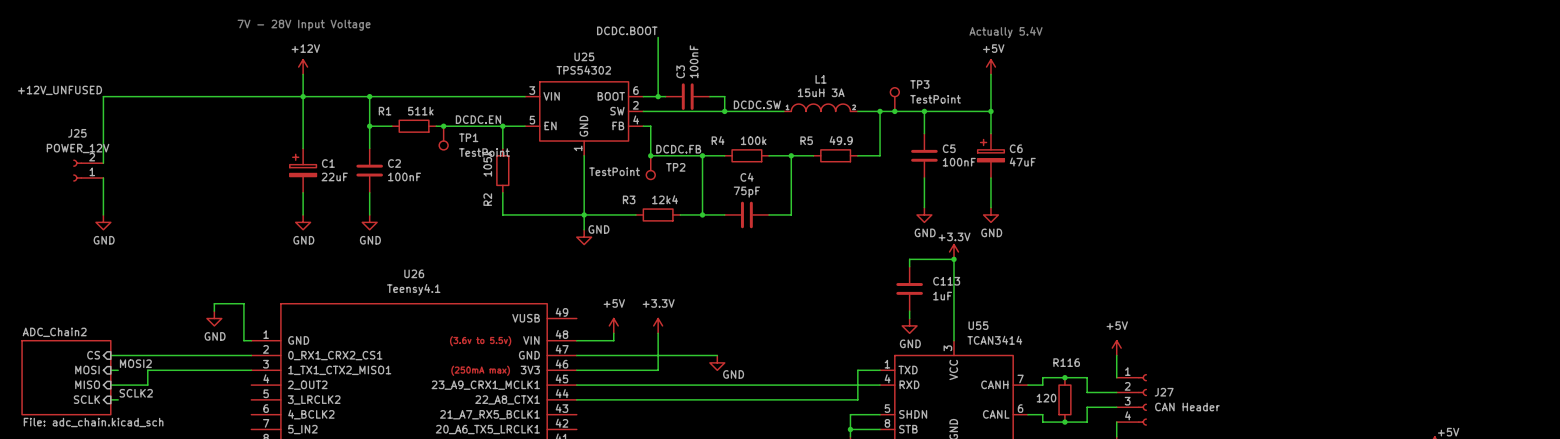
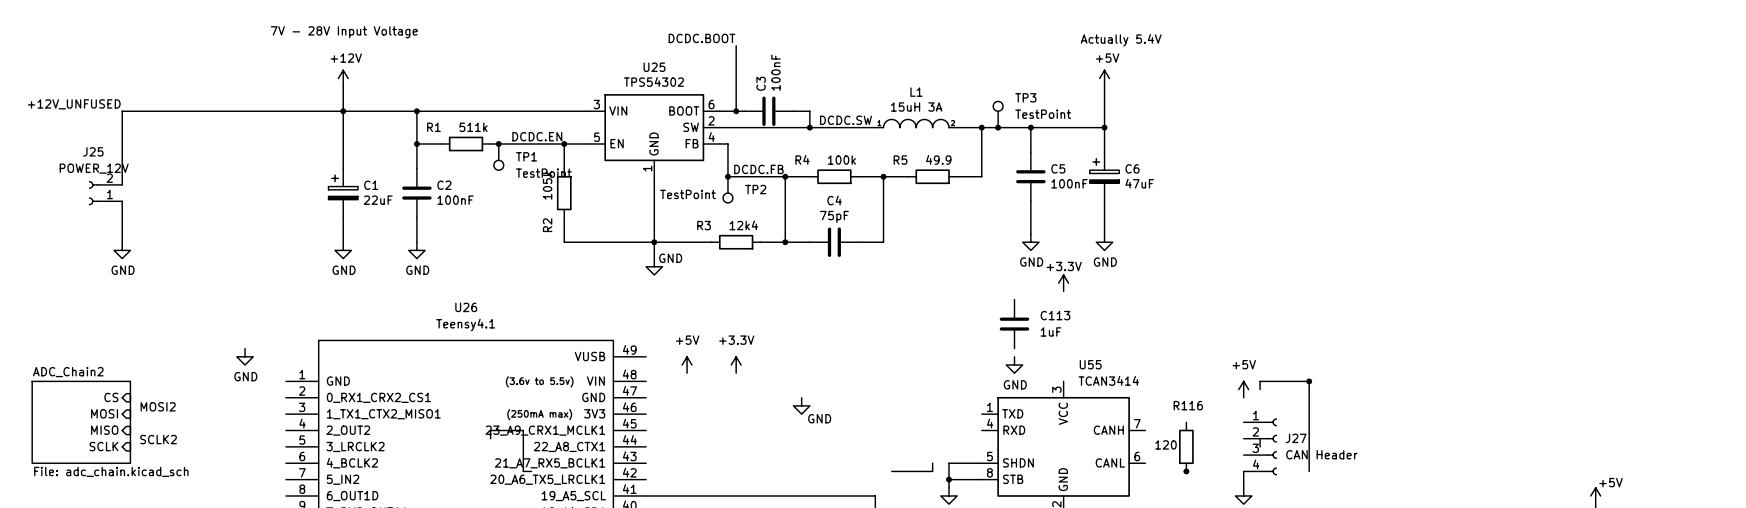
junction: (954, 259) -> none
wire: (909, 266) (909, 259) (954, 259) (954, 340) -> none
wire: (214, 311) (214, 303) (243, 303) (243, 340) (251, 340) -> none
wire: (909, 311) (909, 318) -> none
wire: (613, 333) (613, 340) (576, 340) -> none
wire: (658, 333) (658, 370) (576, 370) -> none
junction: none -> (1309, 381)
wire: none -> (1260, 389) (1260, 381) (1309, 381) (1309, 471)
wire: (110, 355) (251, 355) -> none
wire: (576, 355) (717, 355) -> none
wire: (1116, 355) (1116, 377) -> none
wire: (110, 370) (118, 370) -> none
wire: (251, 370) (147, 370) (147, 385) (110, 385) -> none
wire: (880, 370) (857, 370) (857, 399) (576, 399) -> none
junction: (1064, 377) -> none
wire: (576, 385) (880, 385) -> none
wire: (1027, 385) (1042, 385) (1042, 377) (1087, 377) (1087, 392) (1116, 392) -> none
wire: none -> (490, 438) (490, 430) (523, 430) (523, 471) (531, 471)
wire: none -> (1260, 438) (1260, 446)
wire: (110, 399) (118, 399) -> none
wire: (1116, 407) (1087, 407) (1087, 422) (1042, 422) (1042, 414) (1027, 414) -> none
wire: none -> (932, 463) (932, 471) (891, 471)

